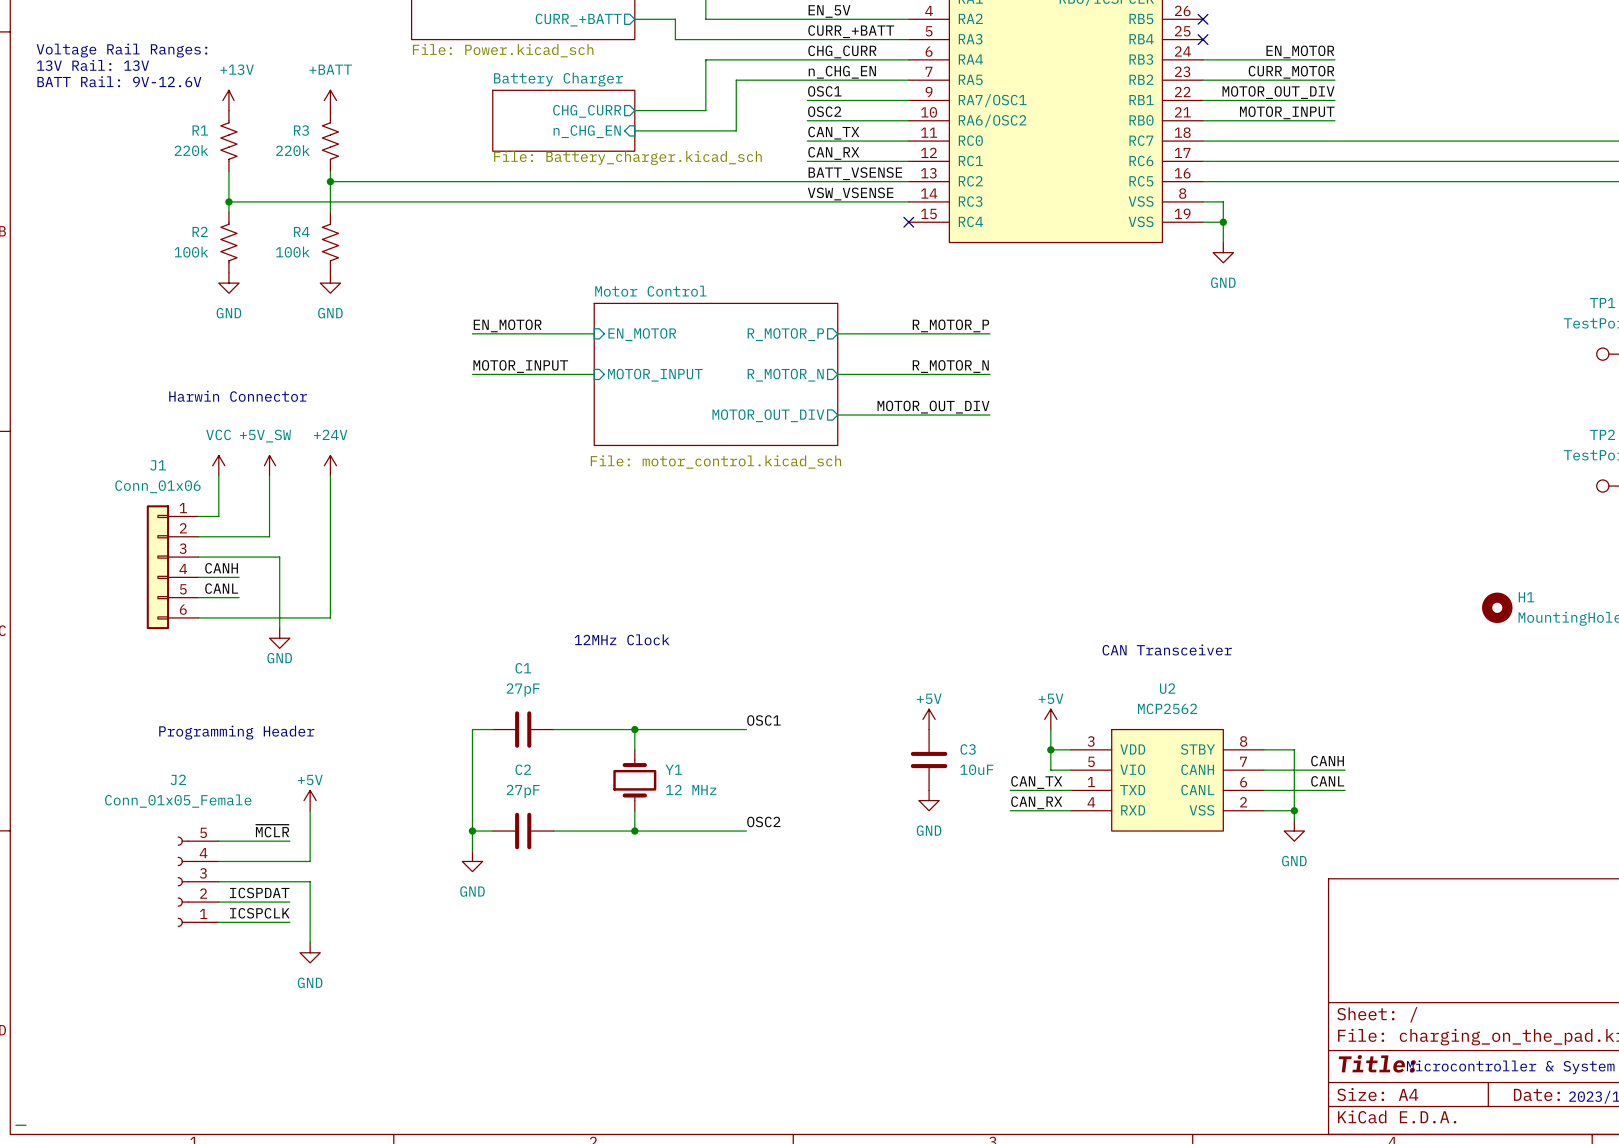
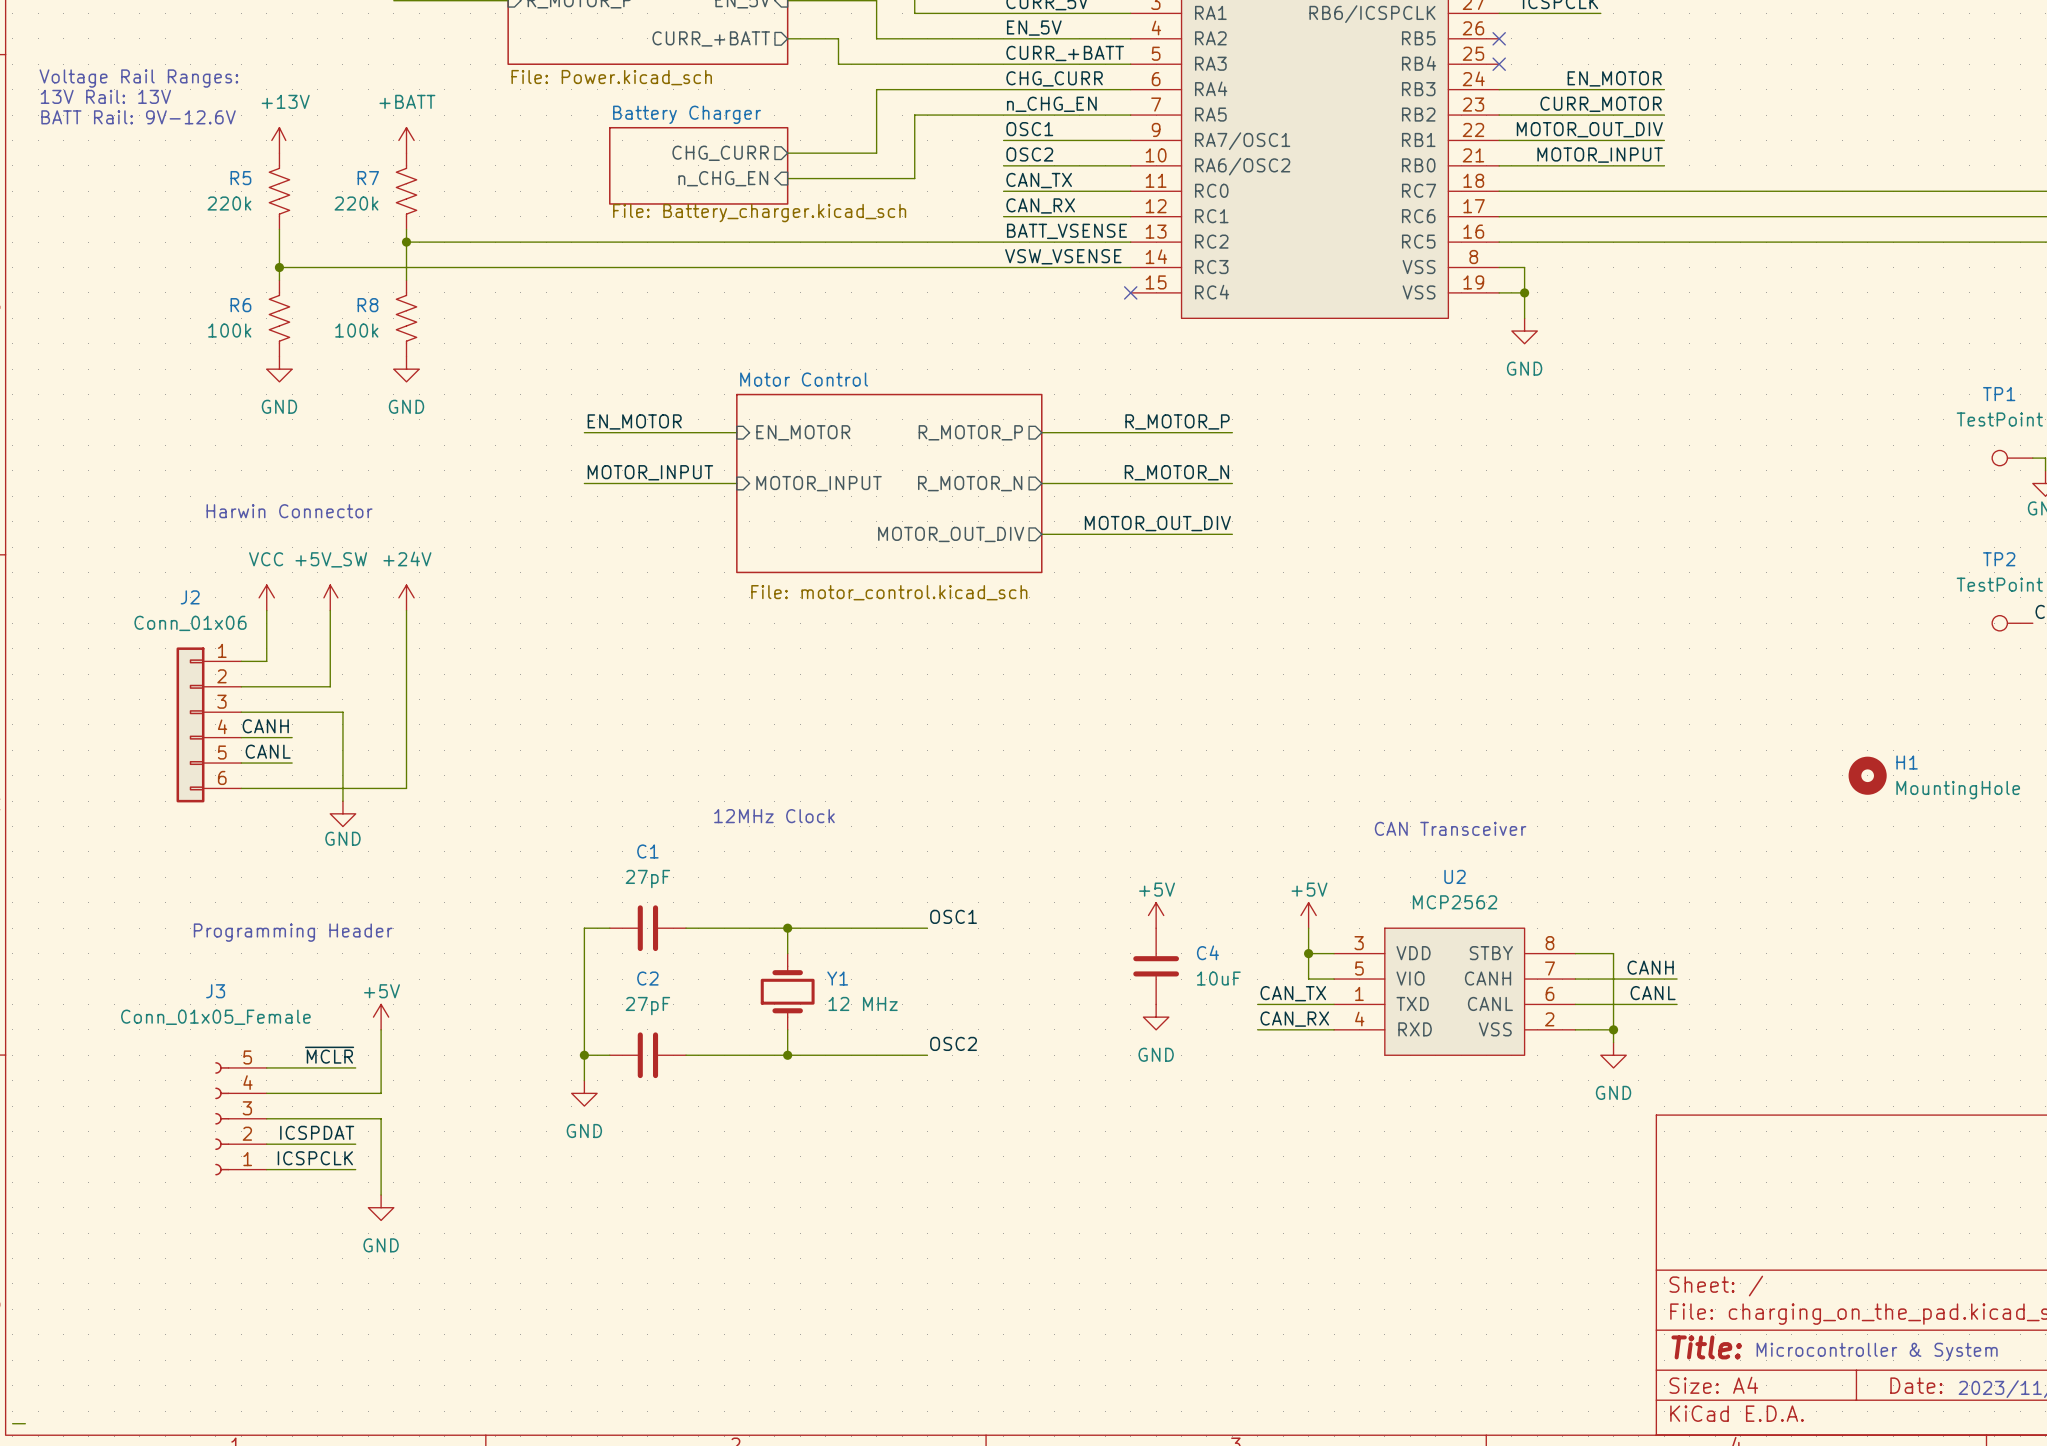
R1 name: R1 (200, 130) -> R5 (240, 178)
R3 name: R3 (301, 130) -> R7 (368, 178)
R2 name: R2 (200, 231) -> R6 (240, 305)
R4 name: R4 (301, 231) -> R8 (367, 305)
J1 name: J1 (158, 465) -> J2 (190, 597)
C3 name: C3 (968, 749) -> C4 (1207, 952)
J2 name: J2 (178, 779) -> J3 (215, 991)

